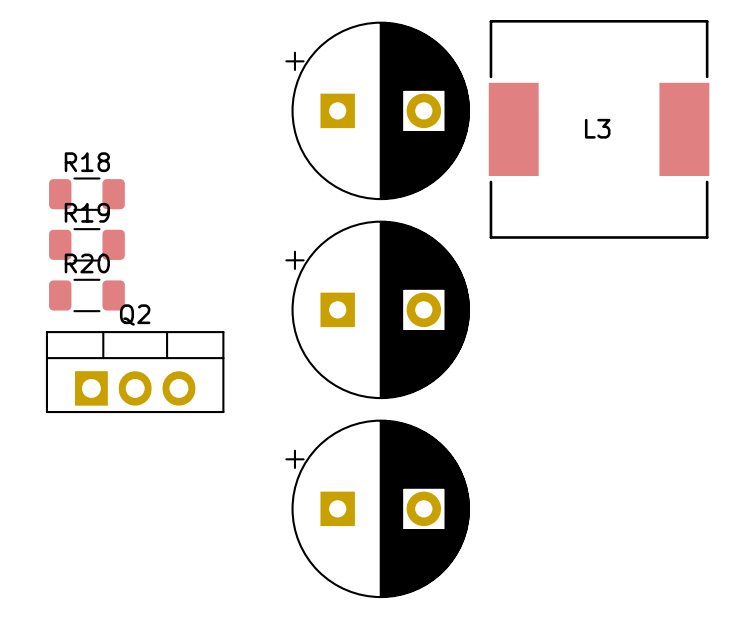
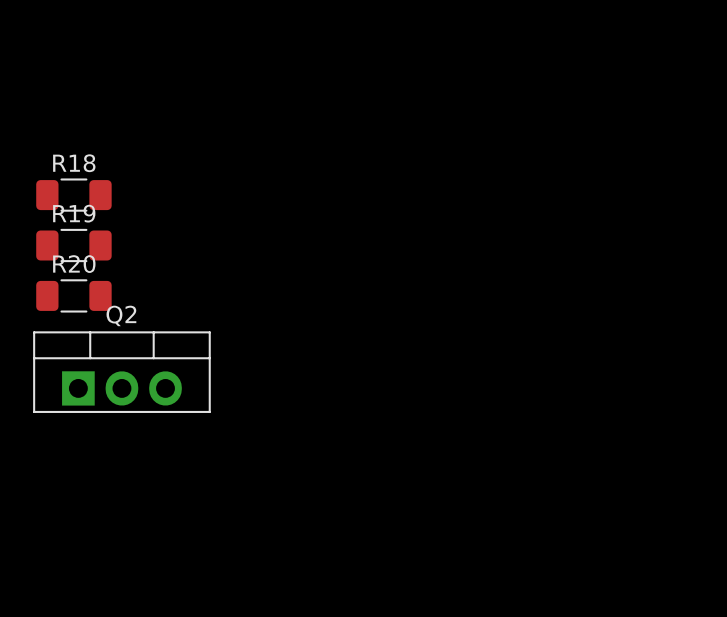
part: (377, 110) -> none
L3: (599, 129) -> none
part: (377, 309) -> none
part: (377, 508) -> none

